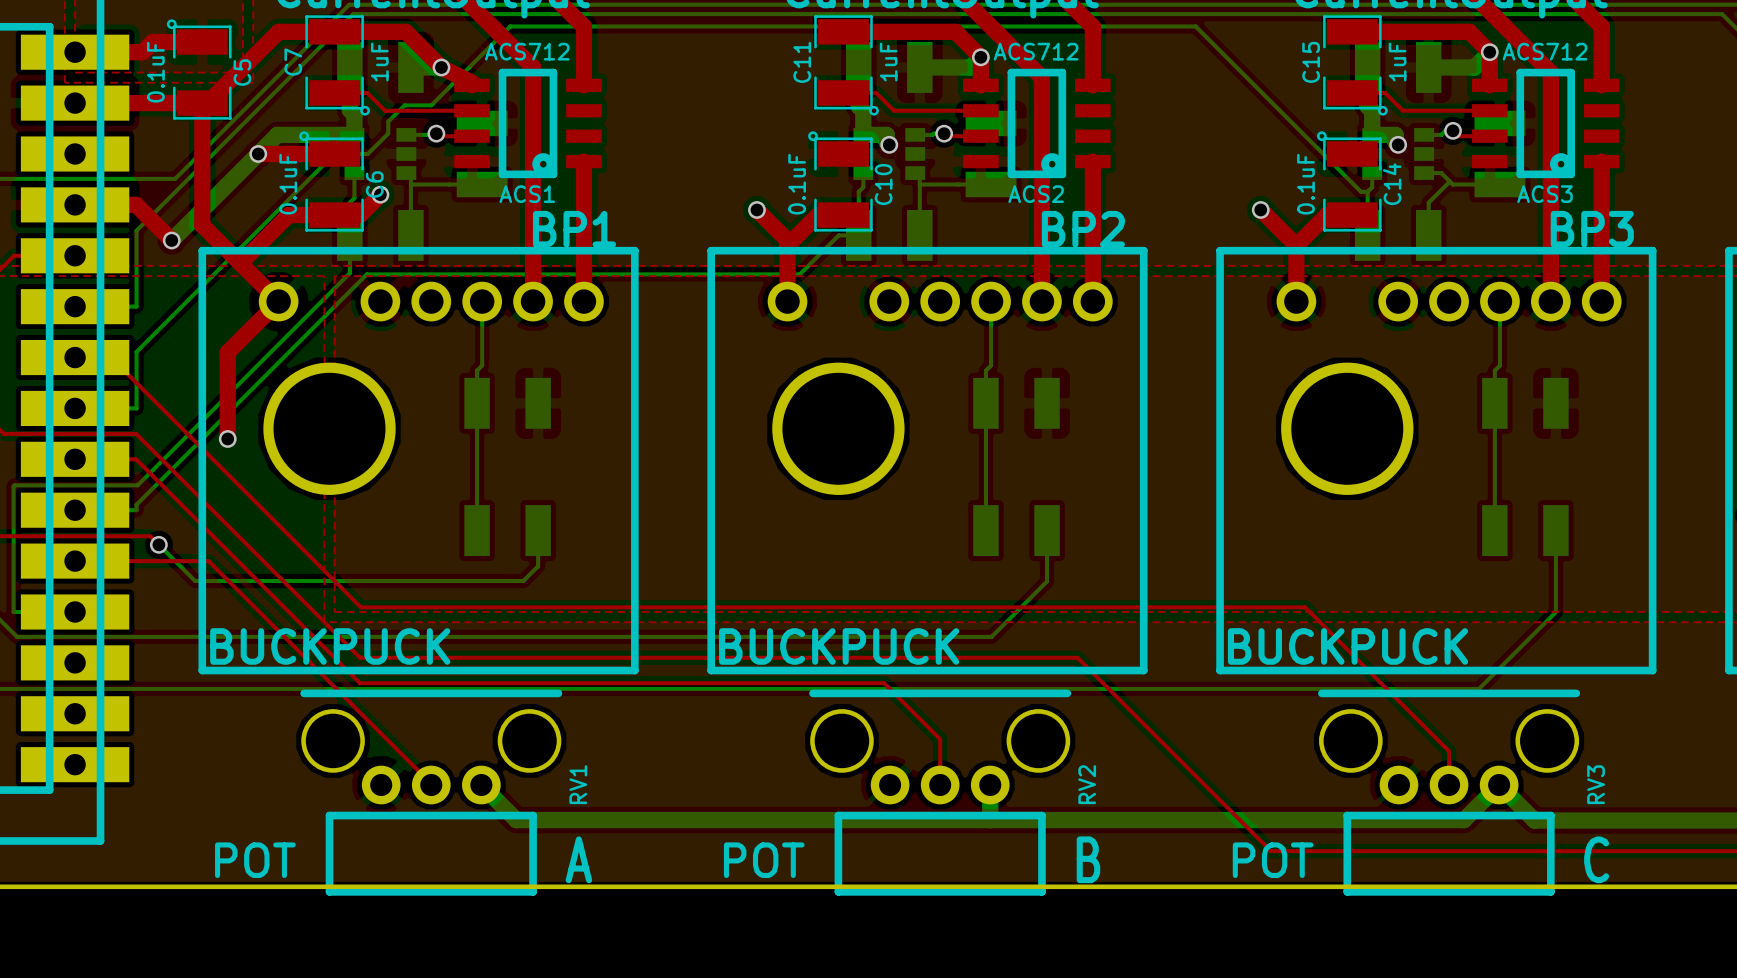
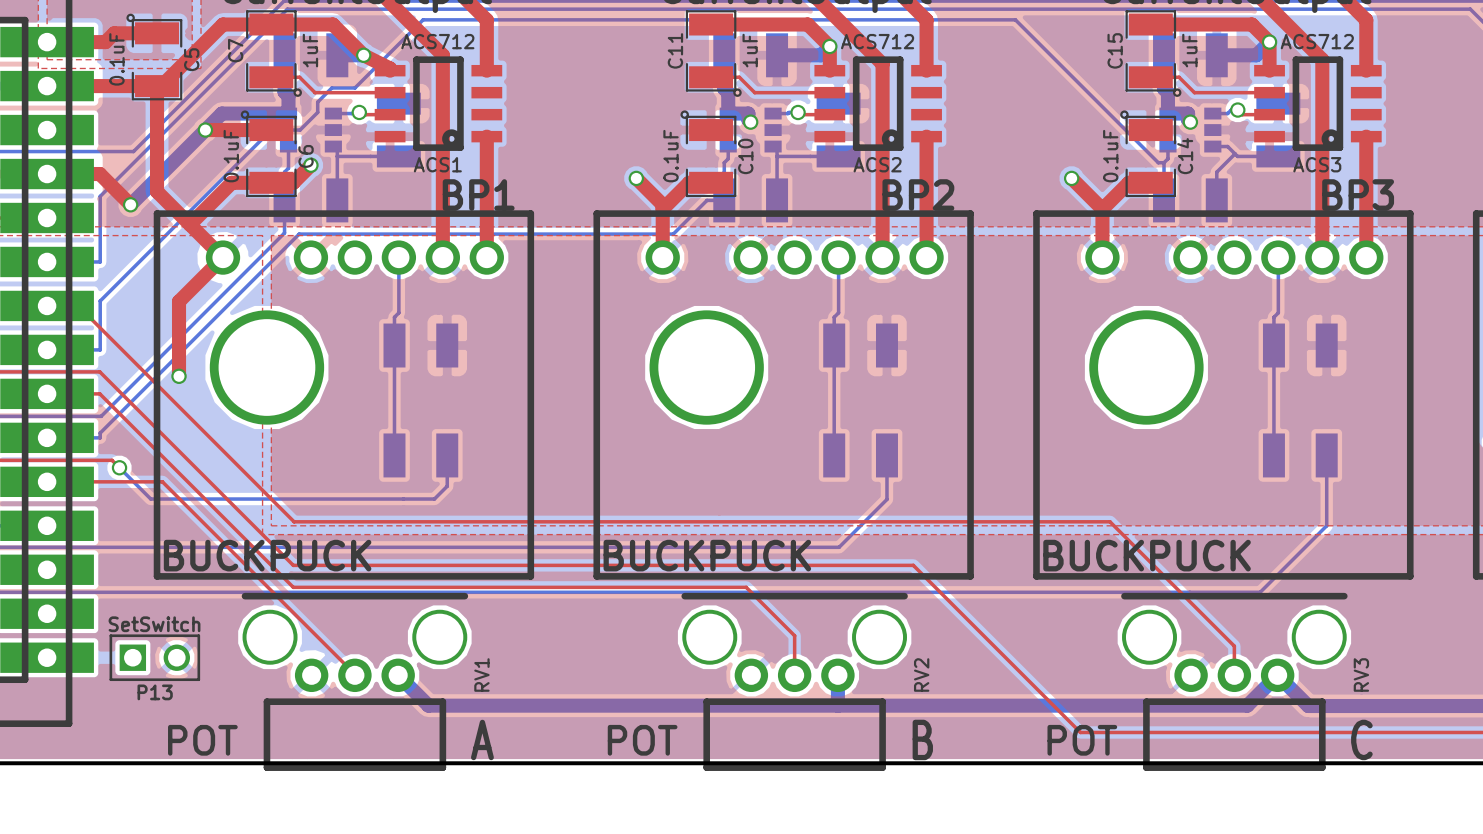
P13: none -> SetSwitch (154, 657)

